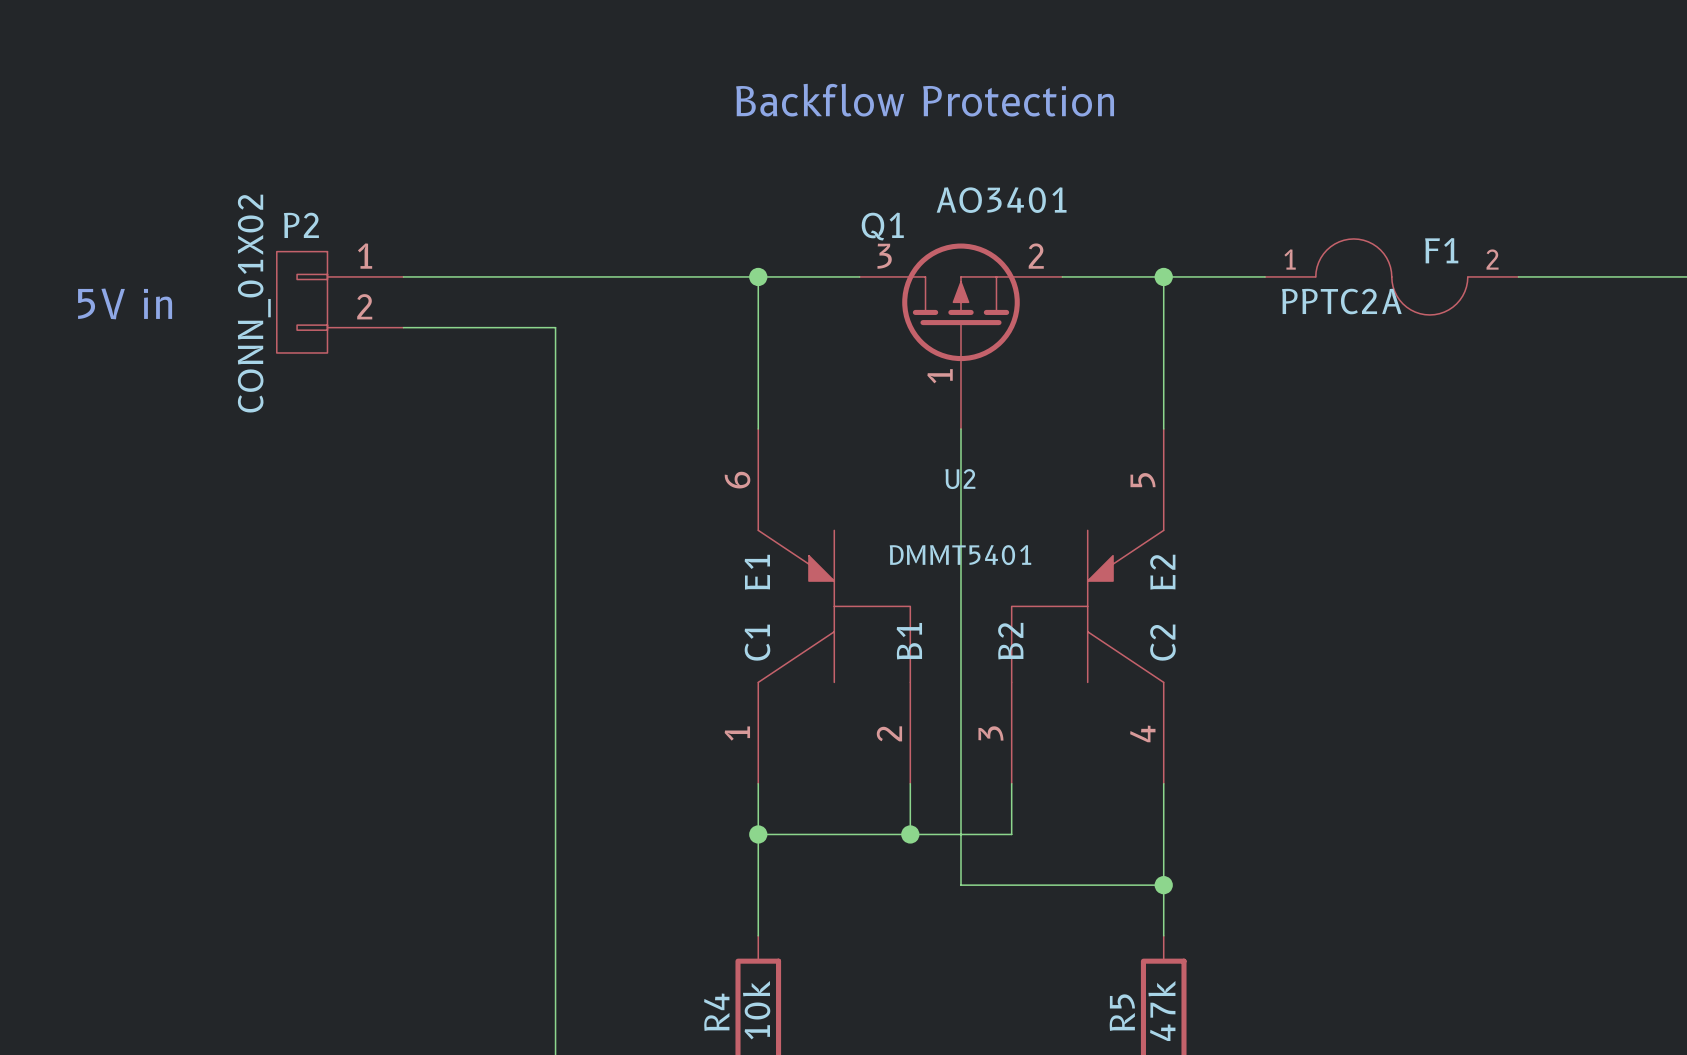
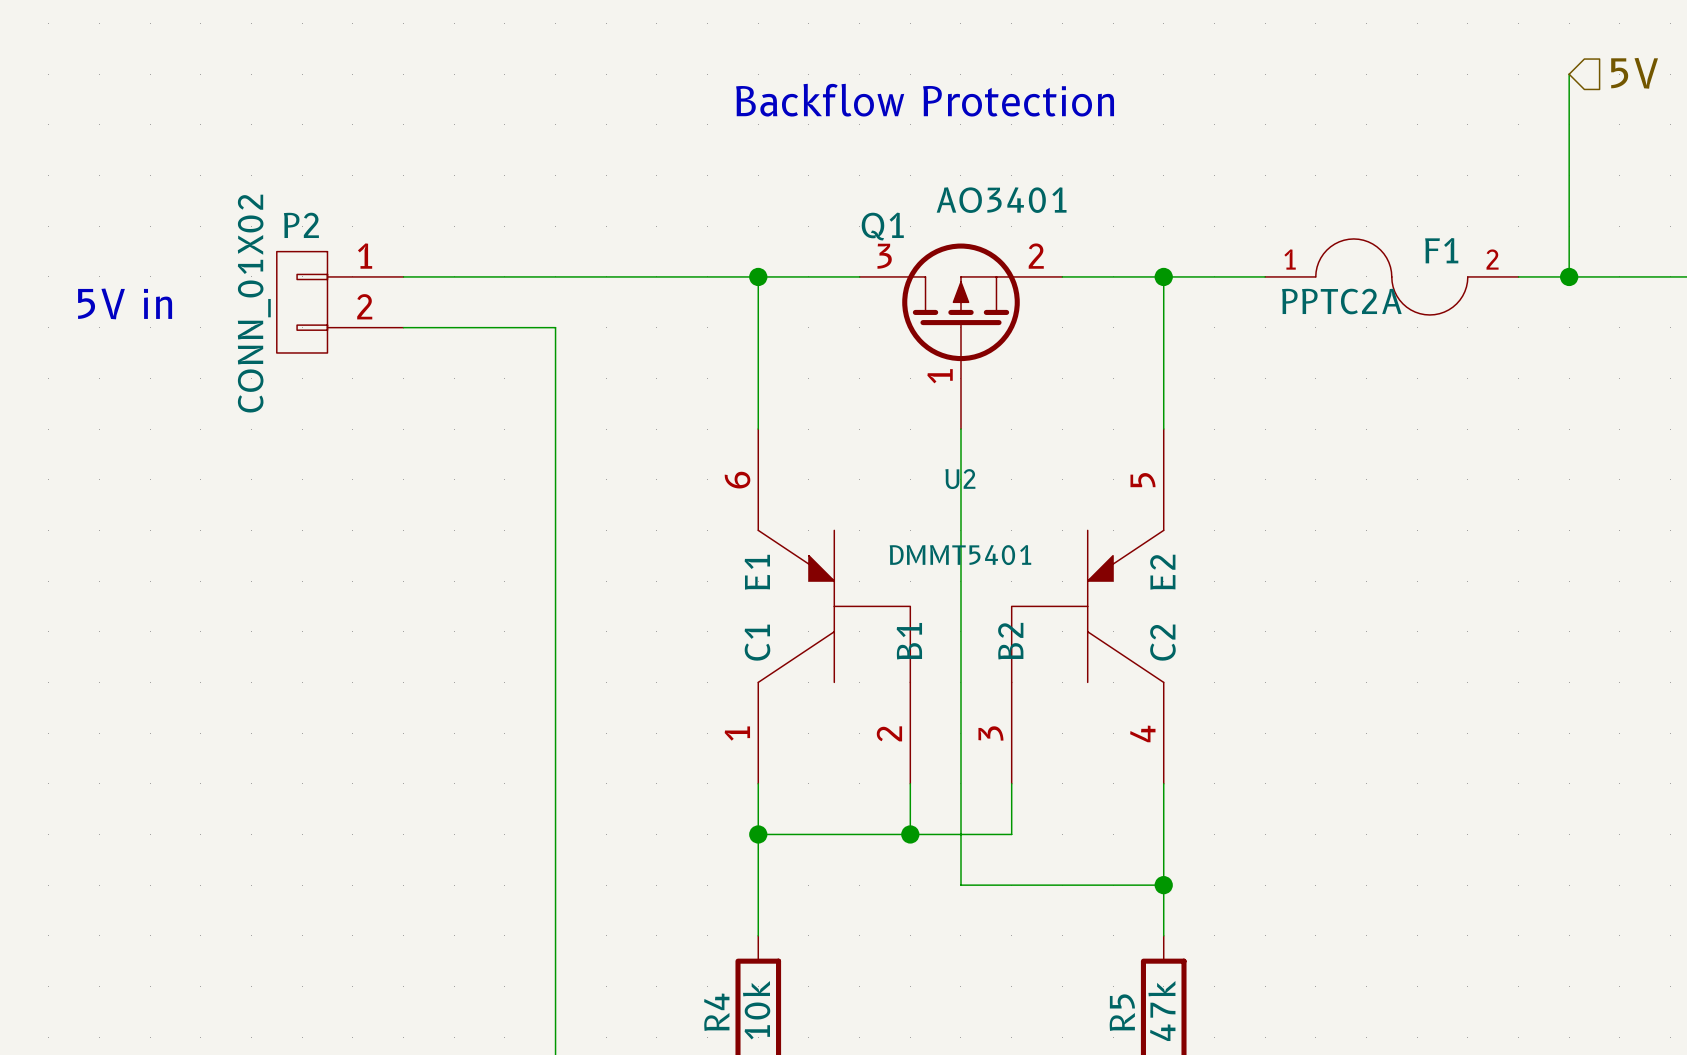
hierarchical label: none -> 5V (1634, 73)
wire: none -> (1569, 74) (1569, 276)
junction: none -> (1569, 276)

